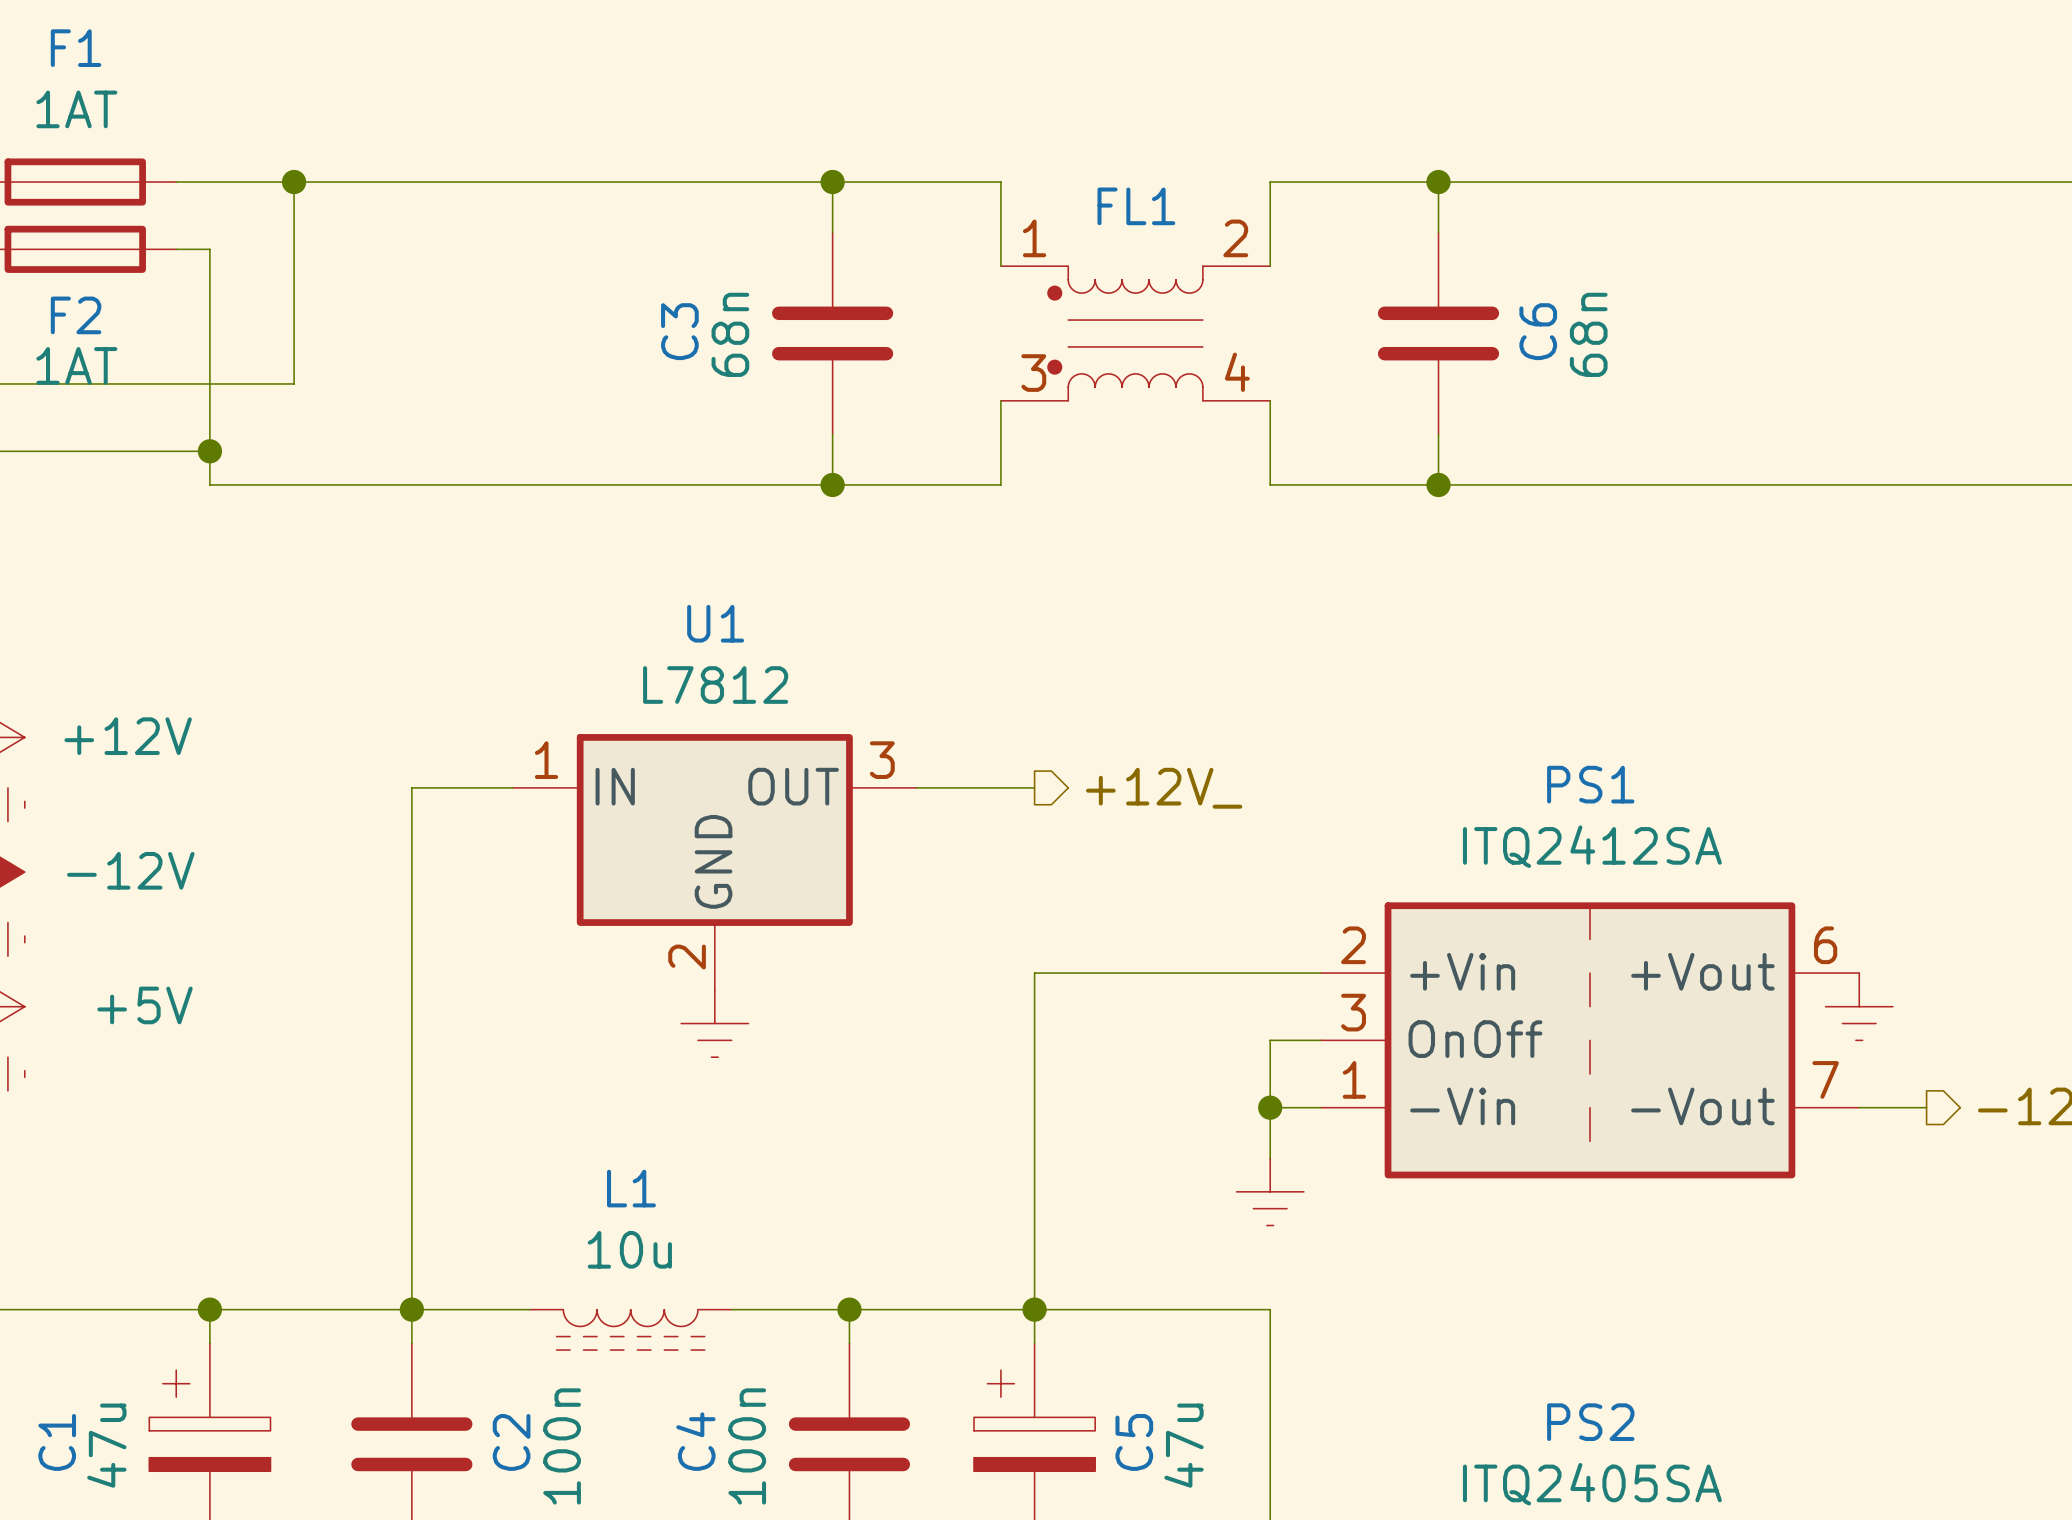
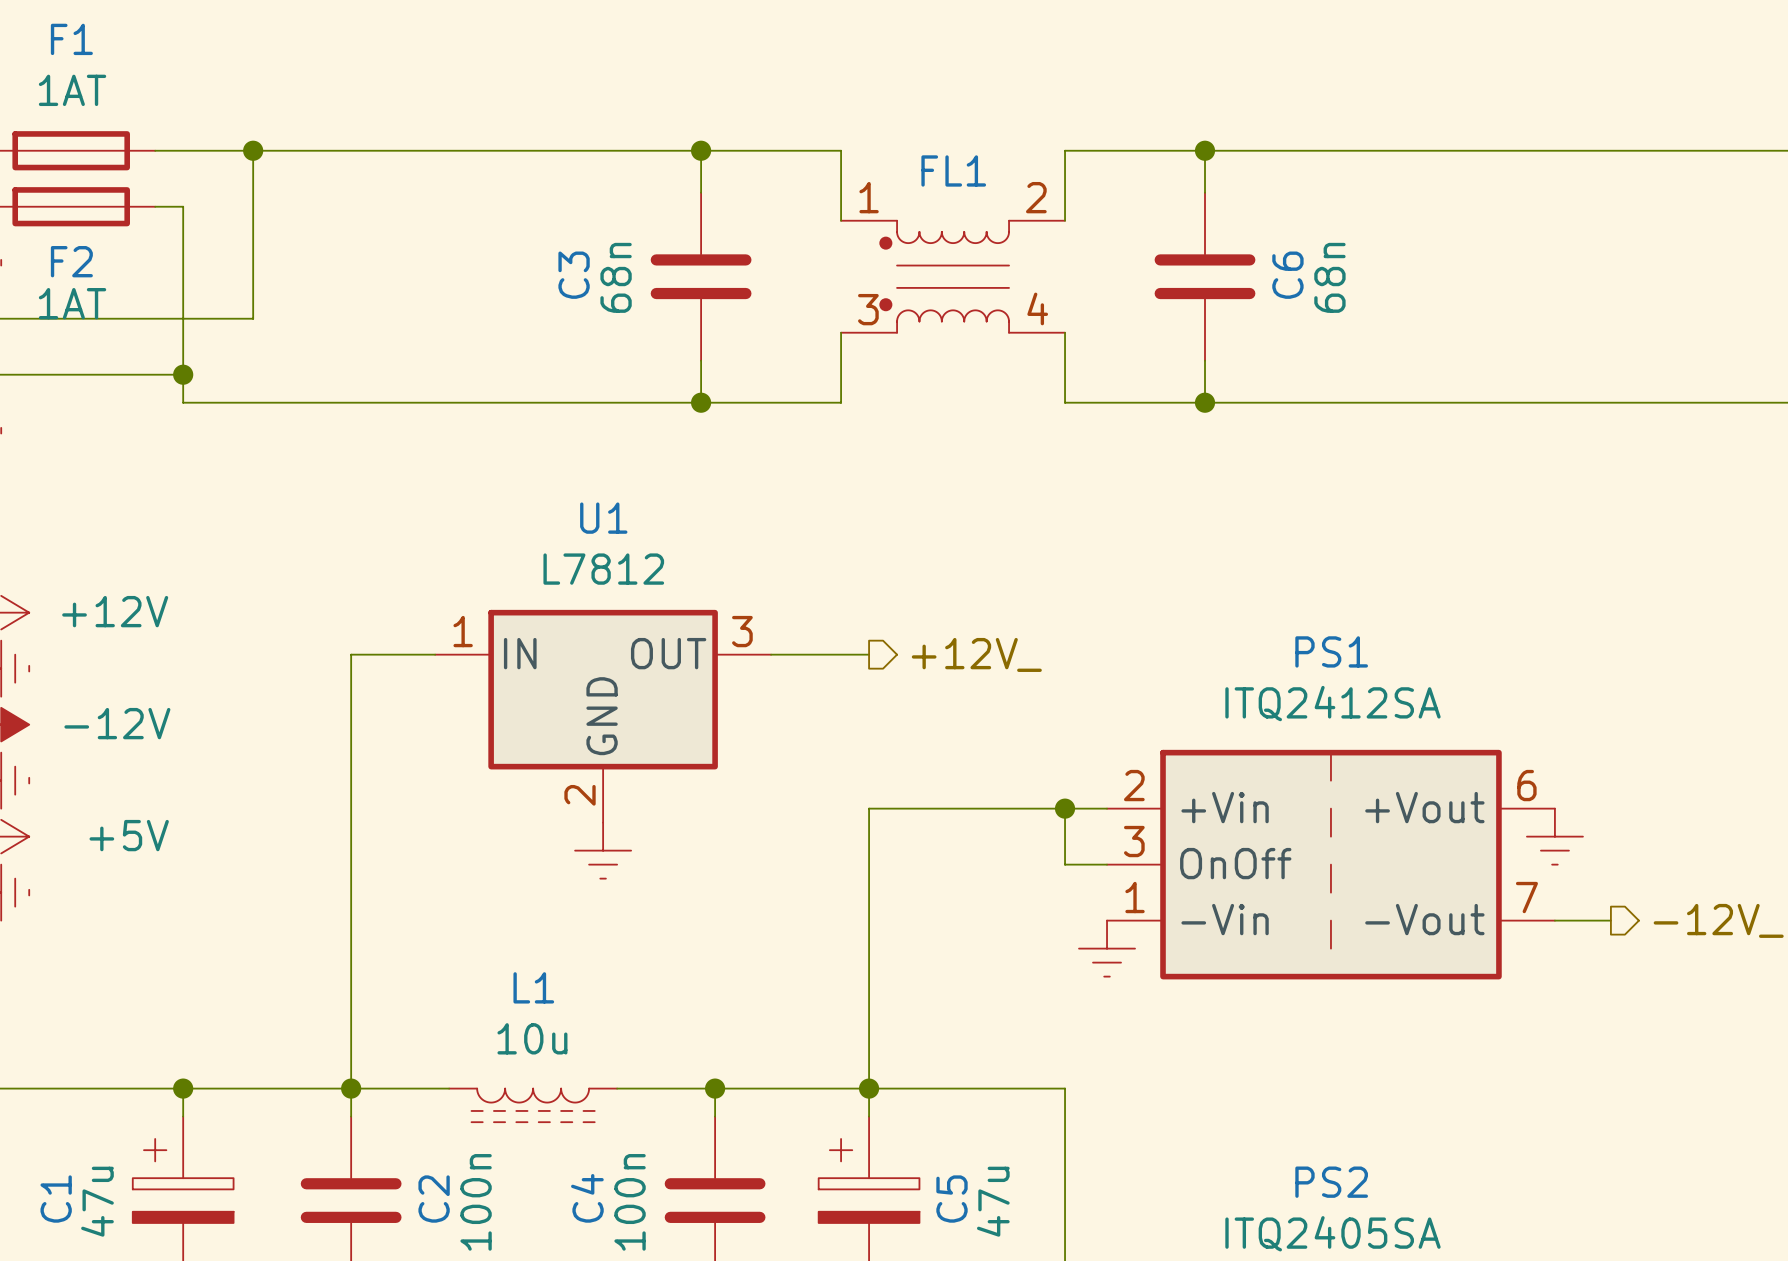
wire: (1270, 1040) (1270, 1158) -> (1065, 864) (1065, 808)
wire: (1270, 1107) (1320, 1107) -> none
junction position: (1270, 1107) -> (1065, 808)
power symbol position: (1270, 1191) -> (1107, 948)

